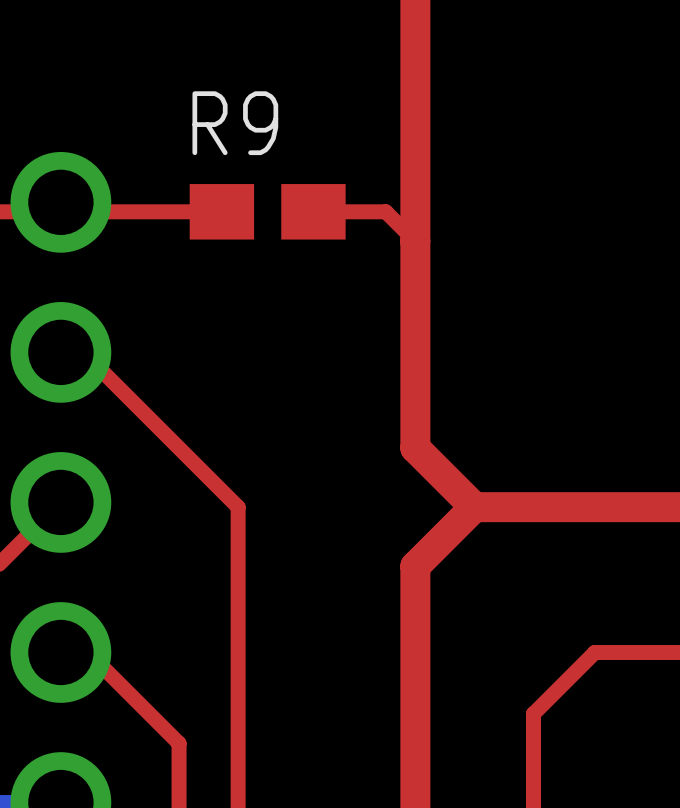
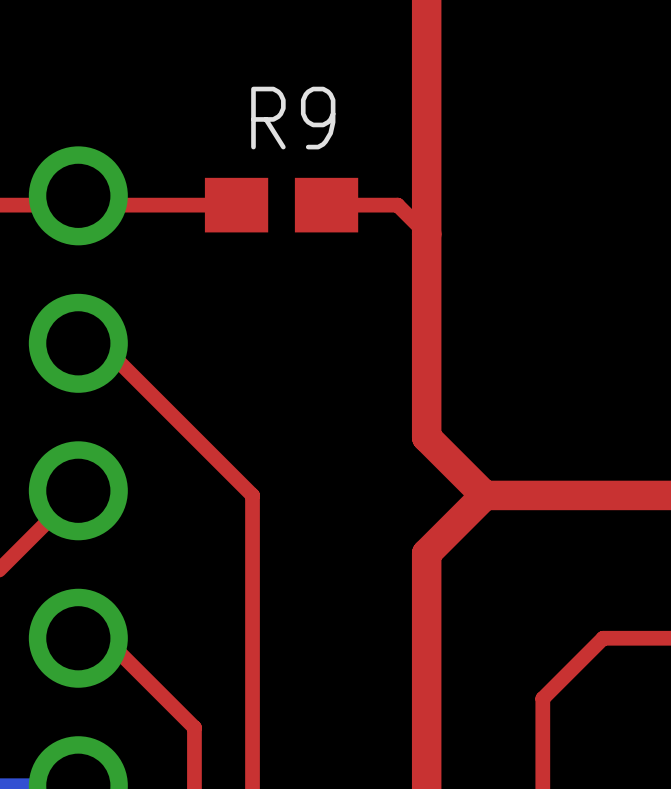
R9 name position: R9 (235, 123) -> R9 (293, 118)

